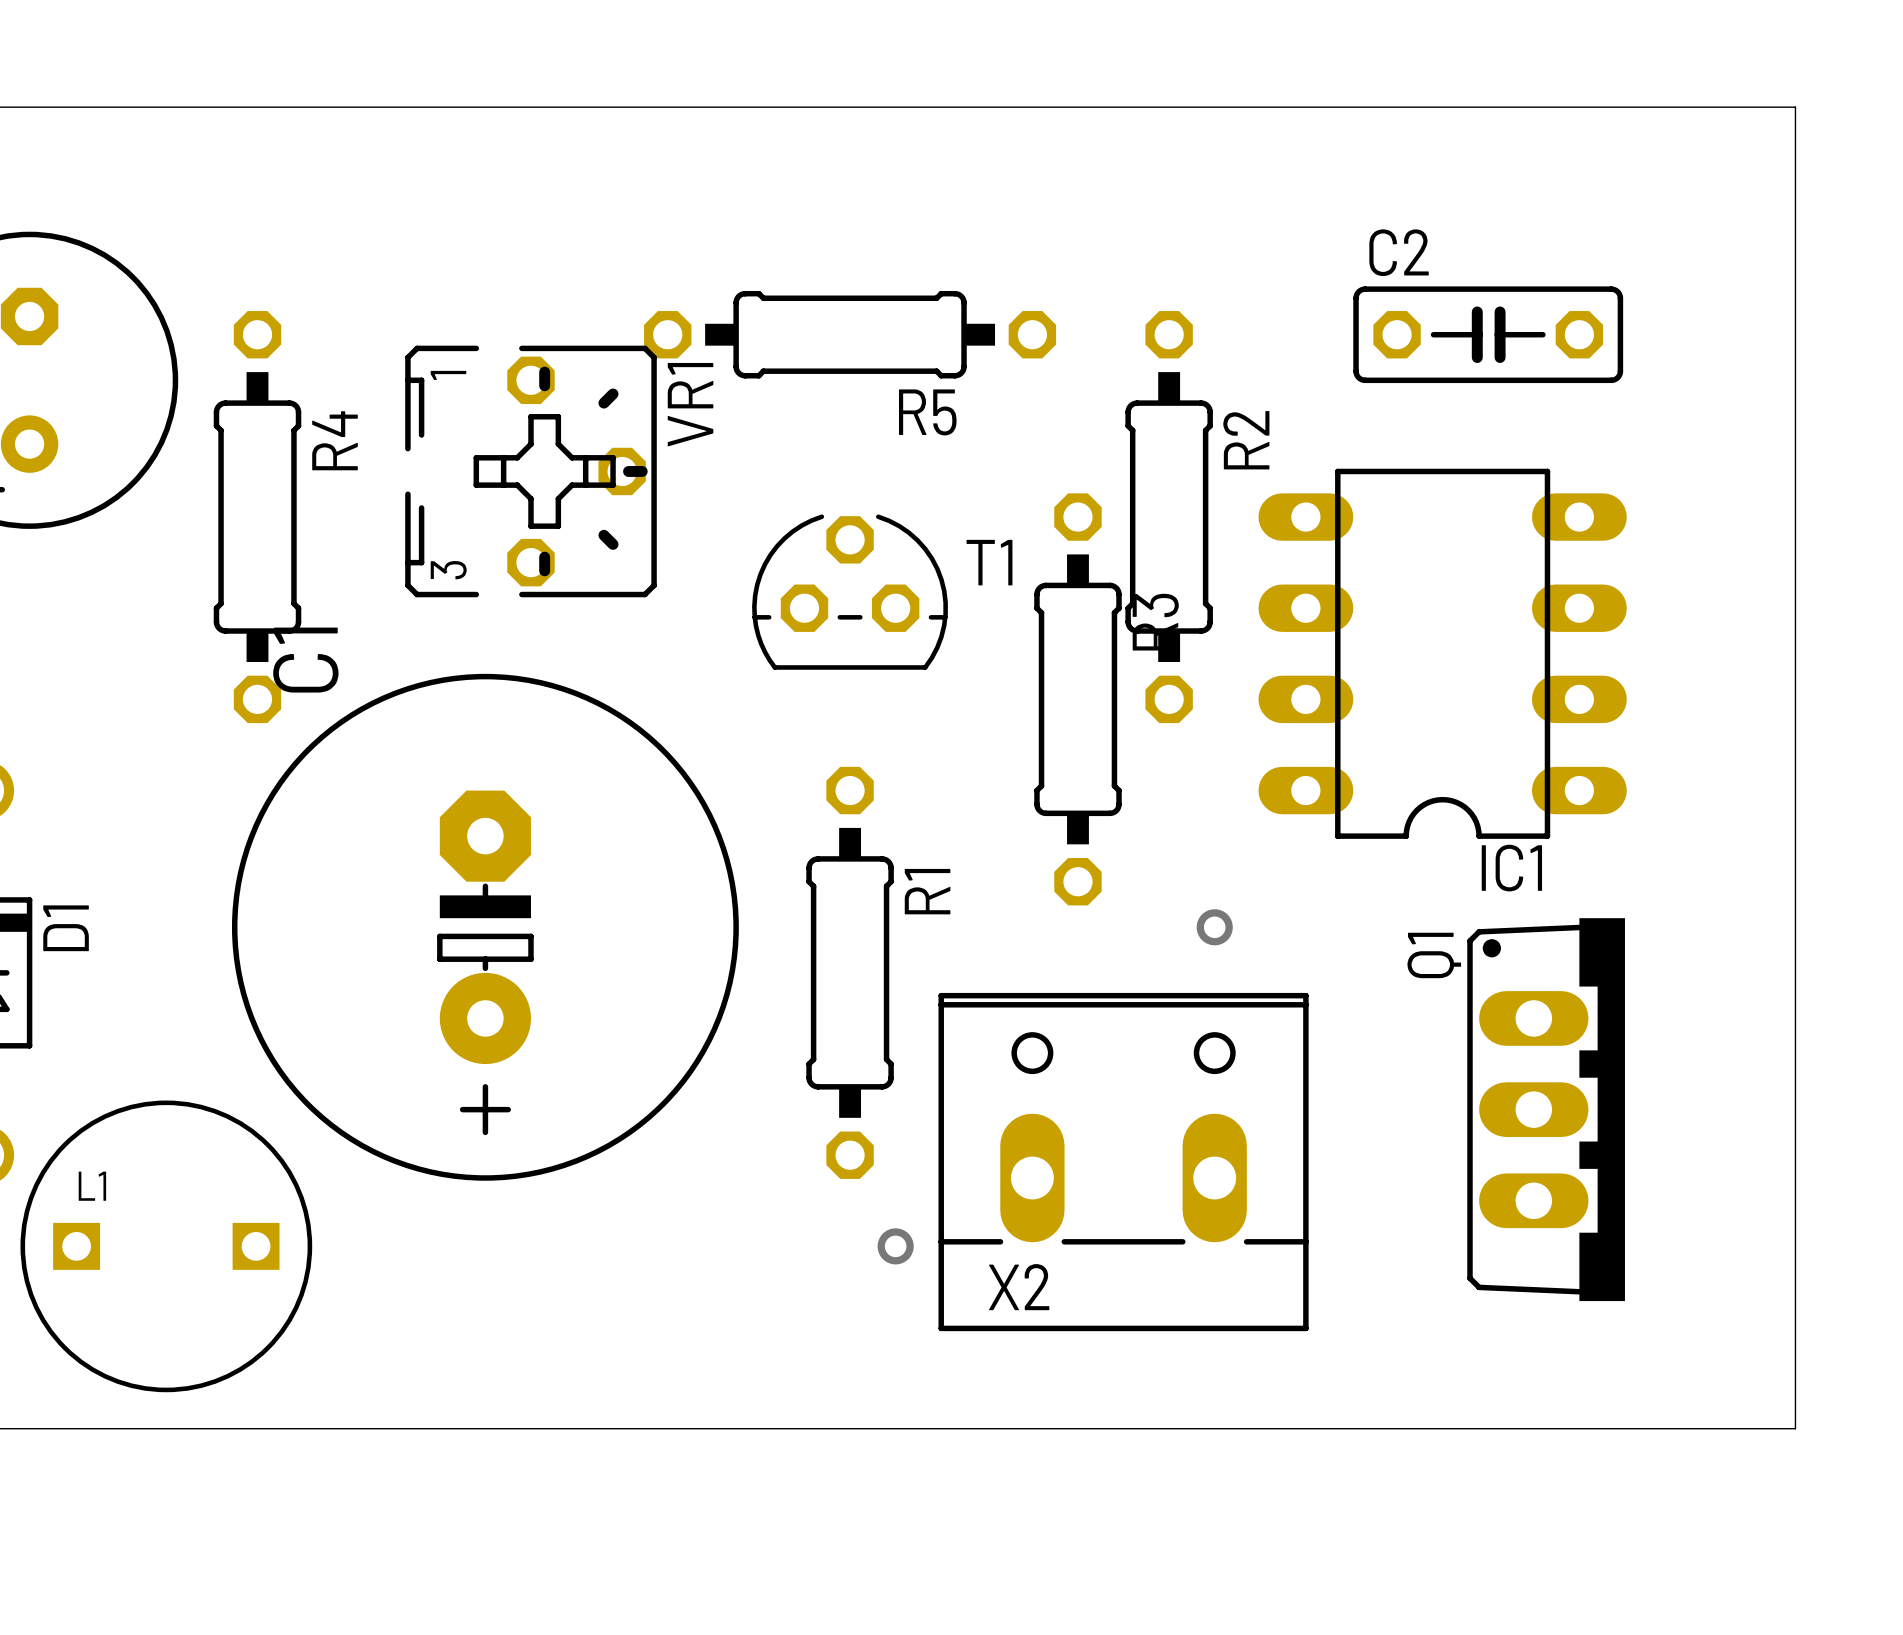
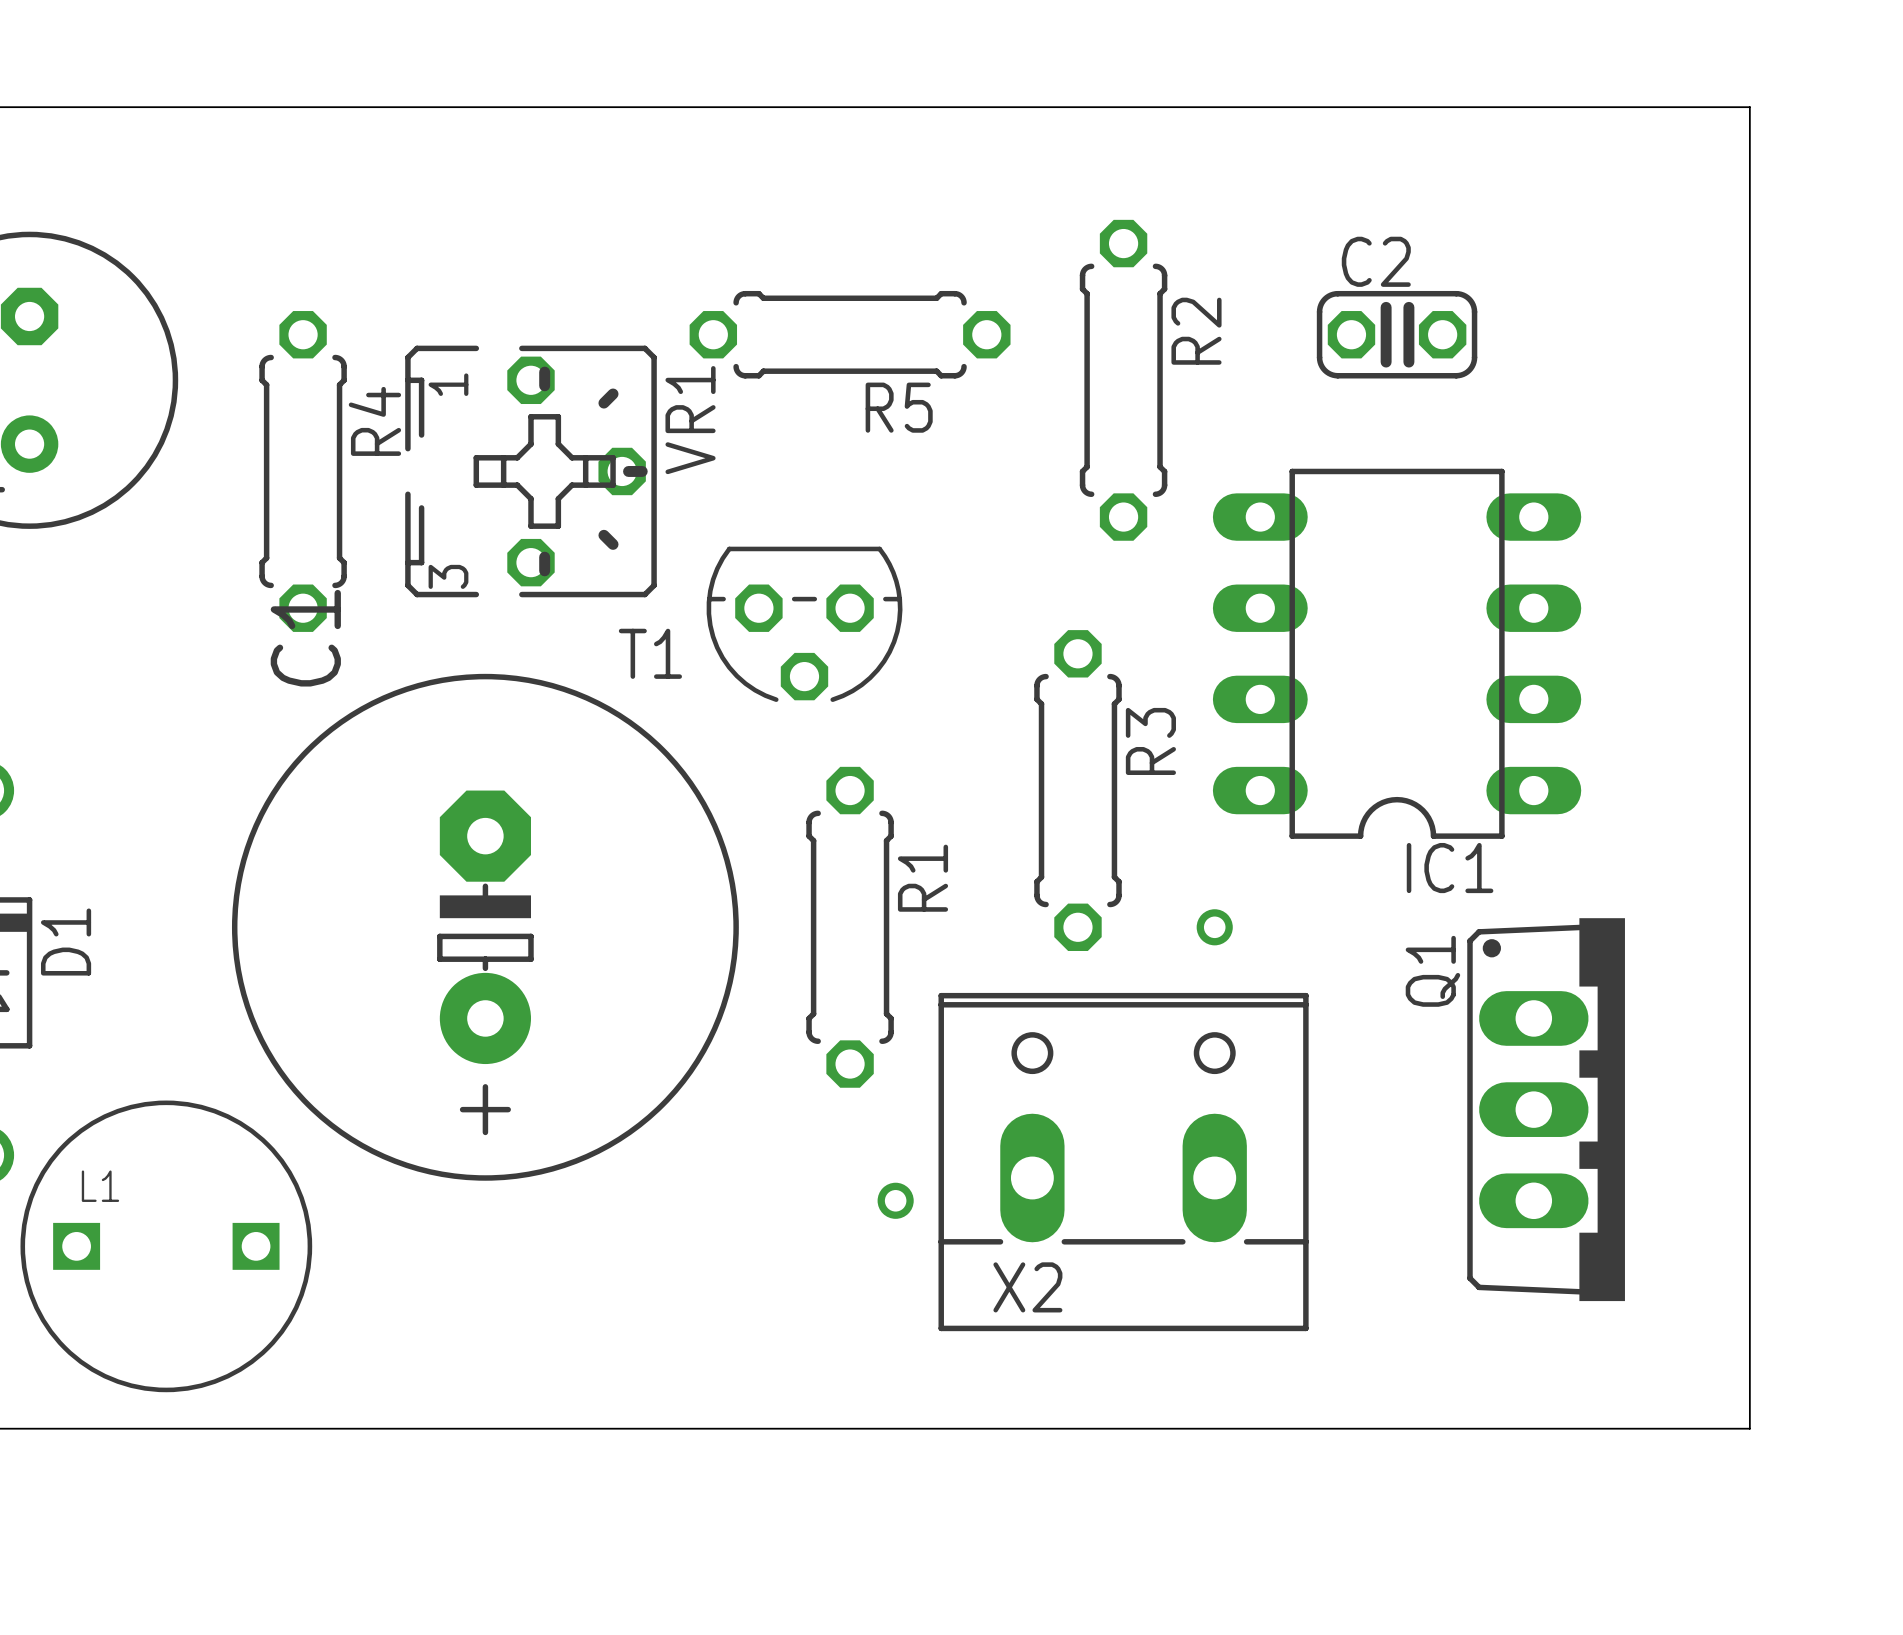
board edge: (1749, 107) (1795, 107) (1795, 1428) (1749, 1428) -> (1749, 107) (1749, 1428)
C2 footprint: [1353, 286, 1624, 384] -> [1316, 290, 1478, 379]
R5 footprint: [644, 290, 1057, 379] -> [689, 290, 1011, 379]
R4 footprint: [213, 311, 302, 724] -> [259, 311, 347, 632]
R2 footprint: [1125, 311, 1213, 724] -> [1079, 219, 1168, 541]
R3 footprint: [1034, 493, 1122, 906] -> [1034, 630, 1122, 952]
T1 rotation: 0° (849, 592) -> 180° (804, 624)
IC1 position: (1442, 653) -> (1397, 653)
R1 footprint: [806, 766, 894, 1179] -> [806, 766, 894, 1088]
via position: (895, 1246) -> (895, 1200)

